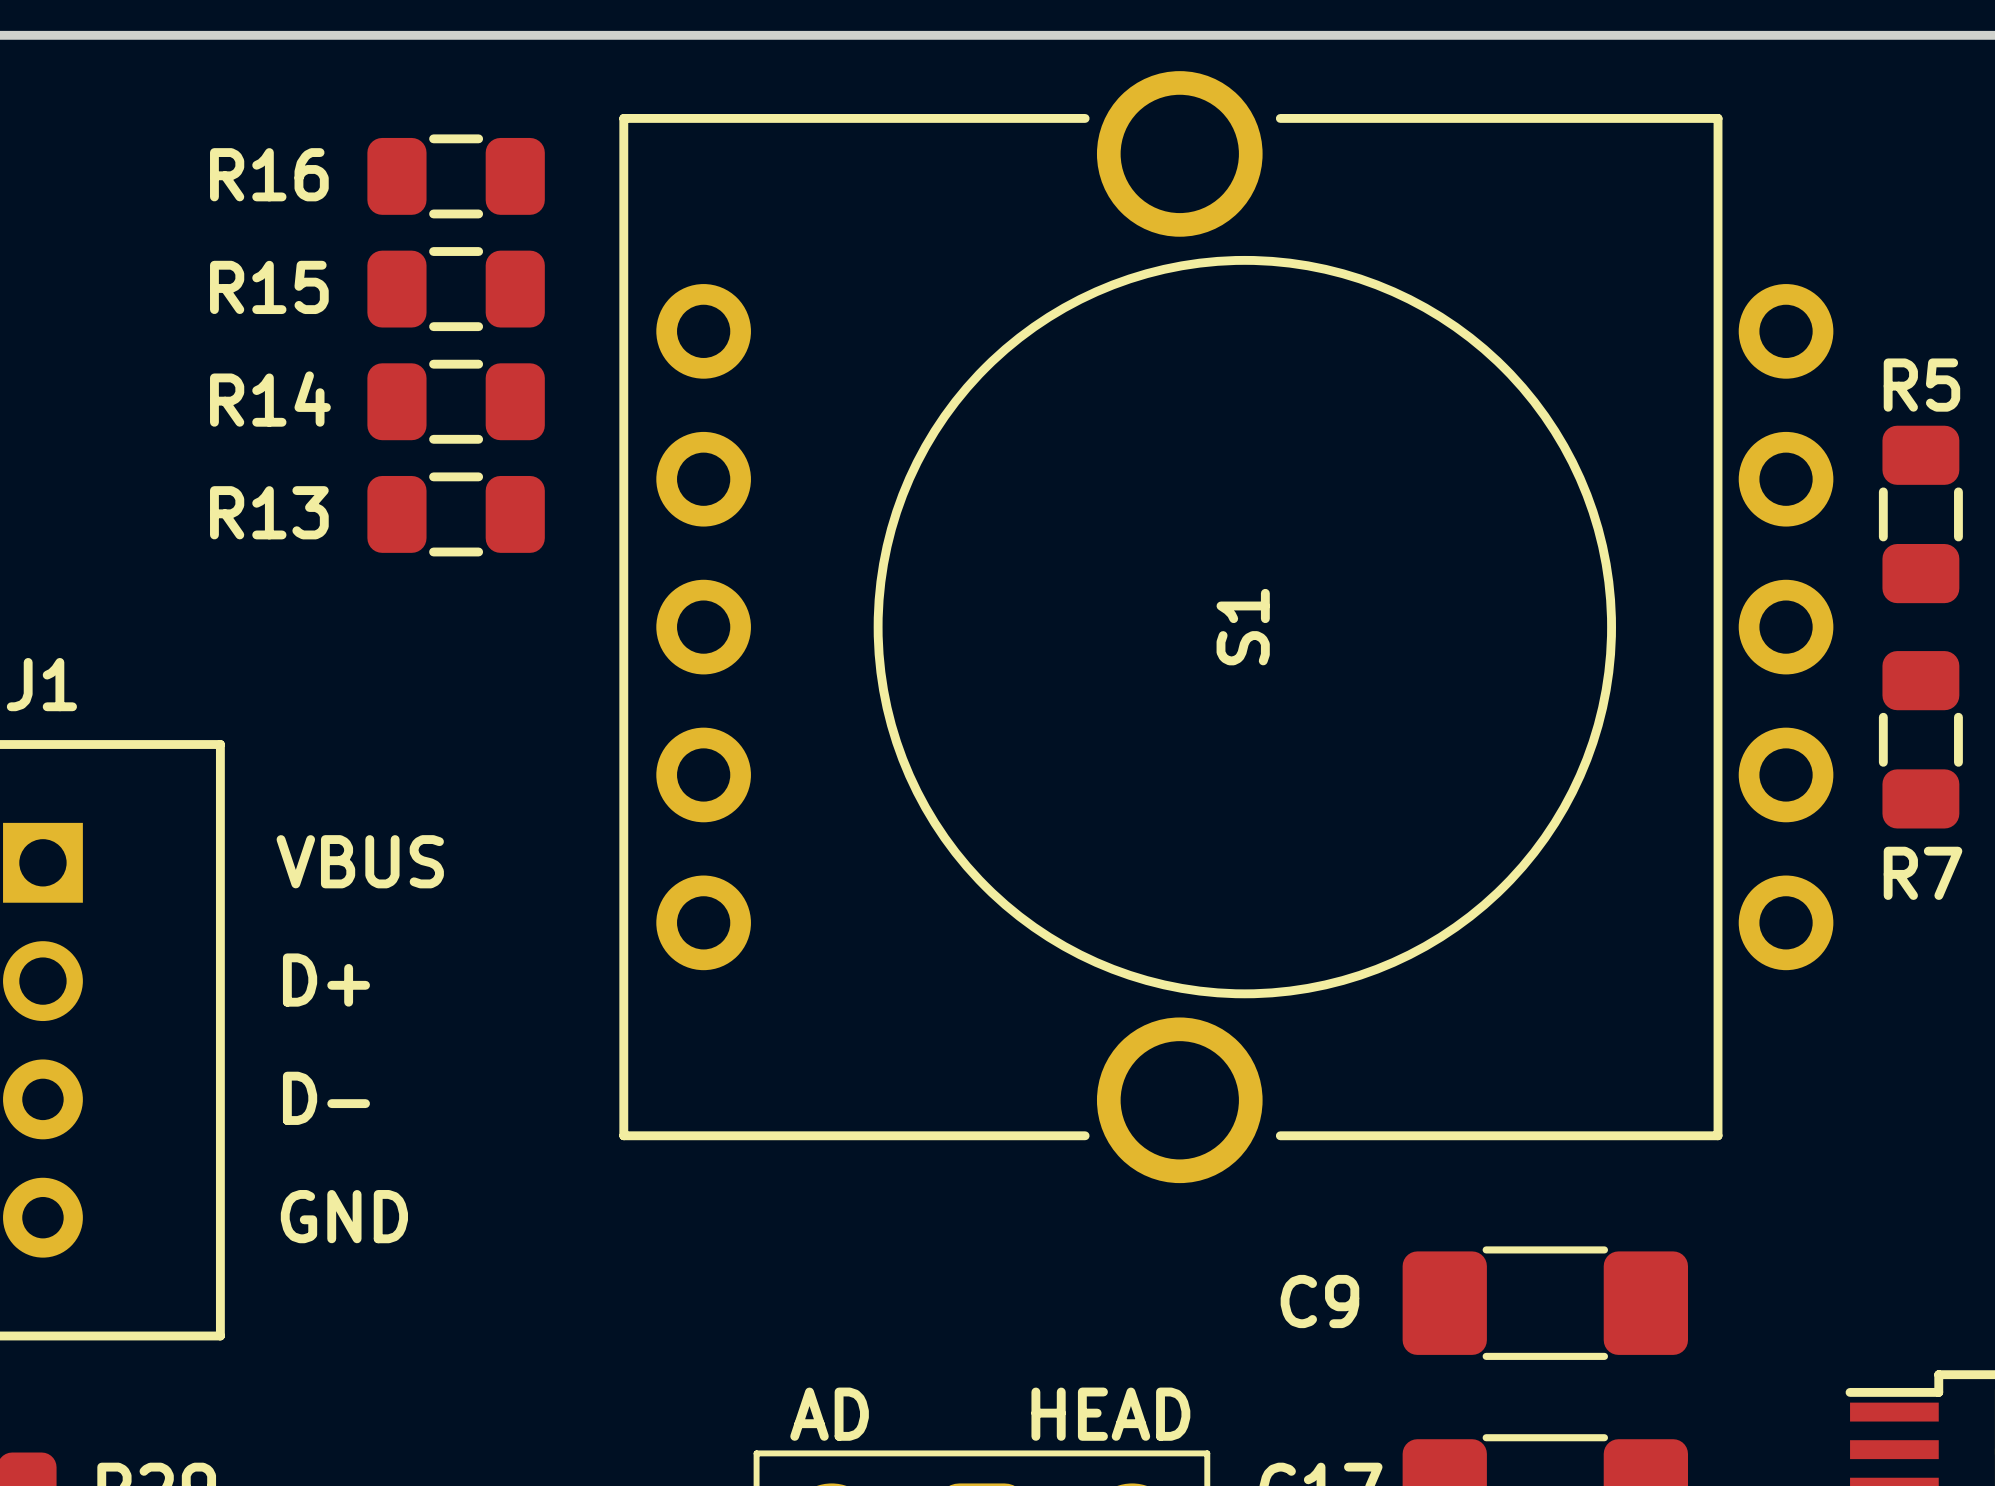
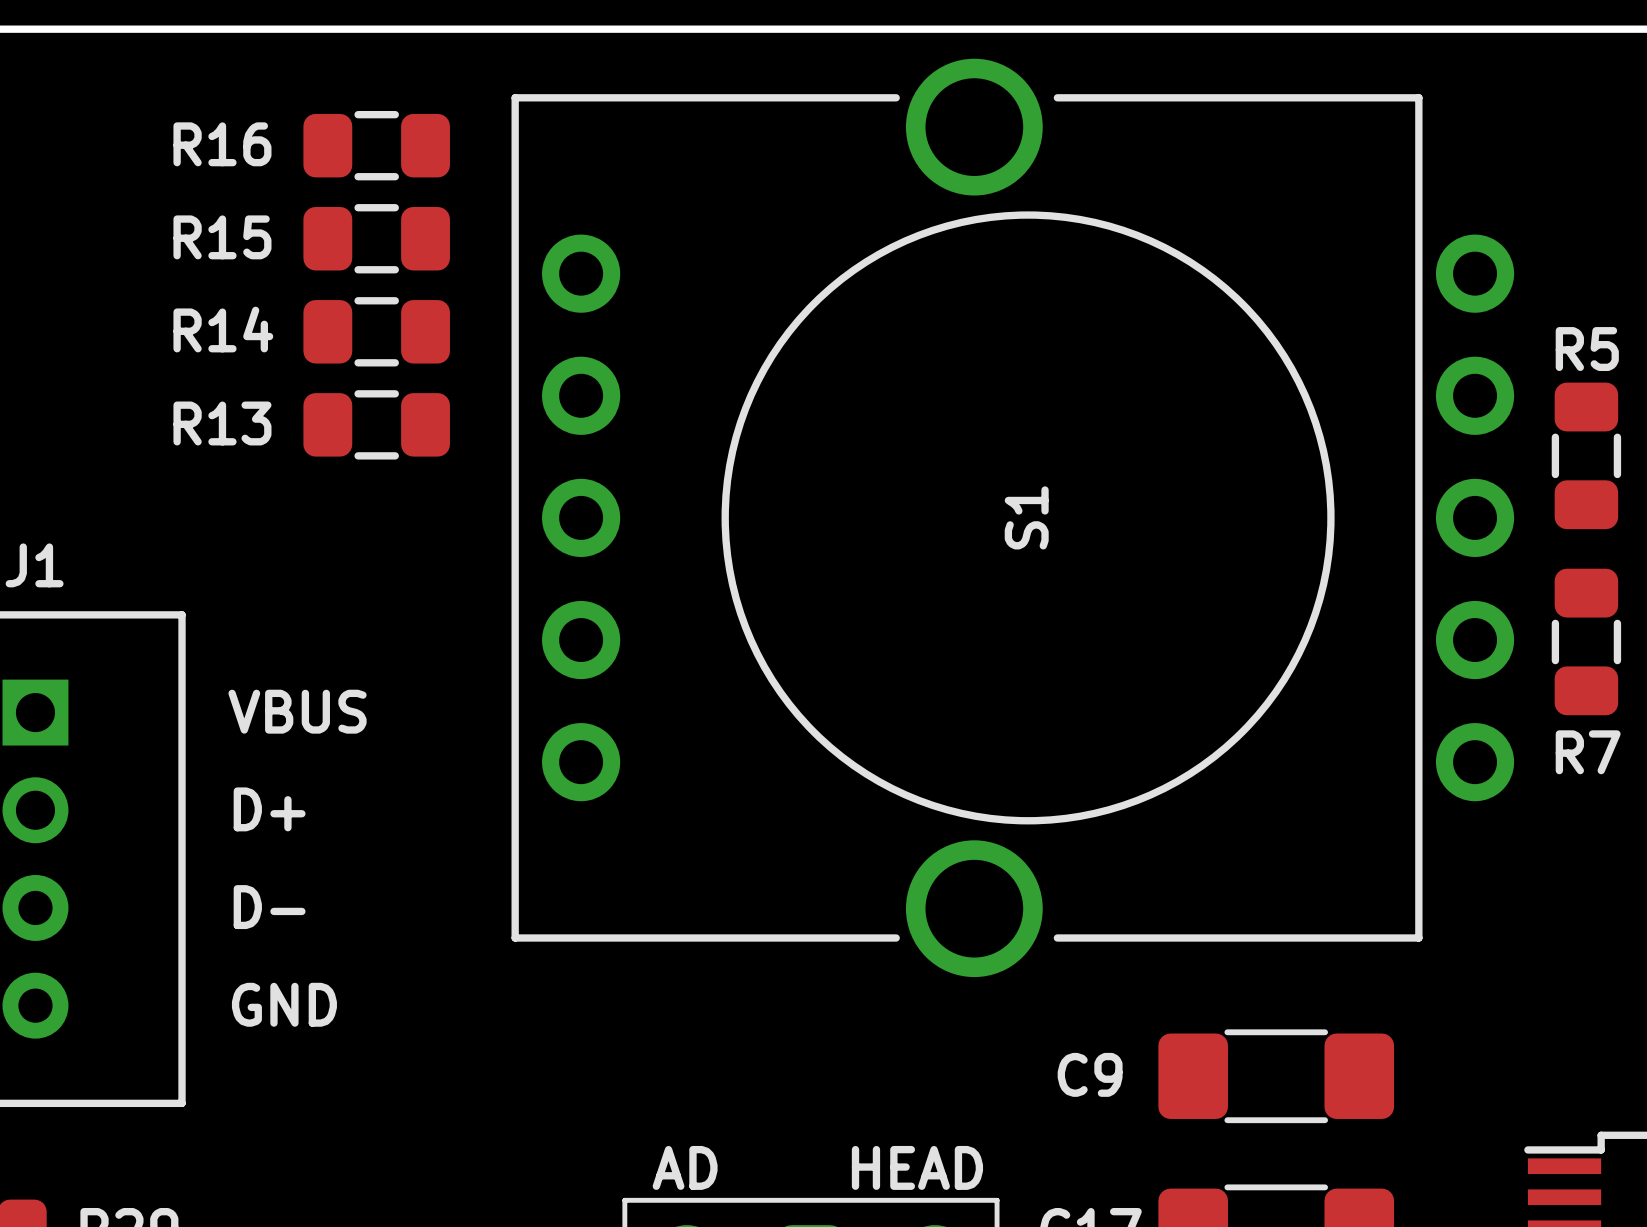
R5 position: (1920, 514) -> (1586, 455)
R7 position: (1920, 739) -> (1586, 641)

